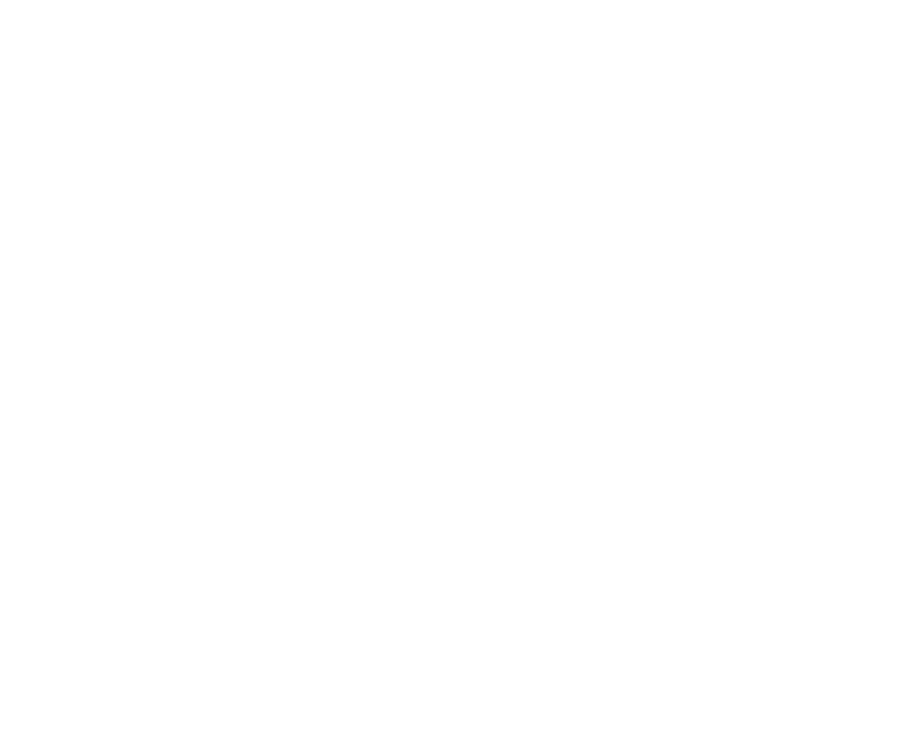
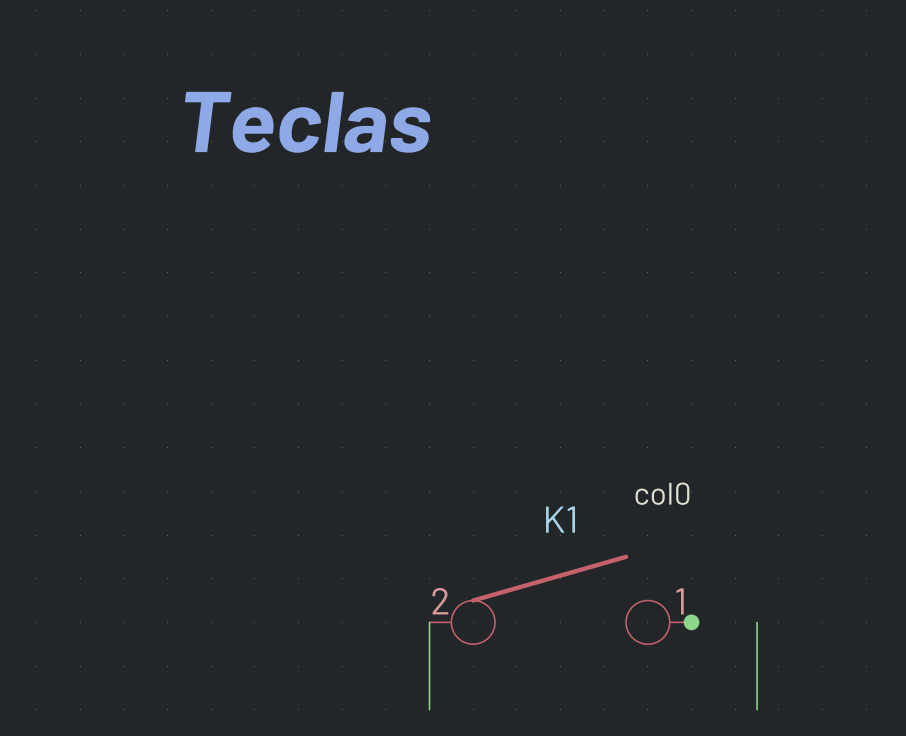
text: none -> Teclas (307, 122)
label: none -> col0 (662, 493)
K1: none -> (560, 599)
wire: none -> (429, 622) (429, 709)
junction: none -> (691, 622)
wire: none -> (757, 622) (757, 709)

